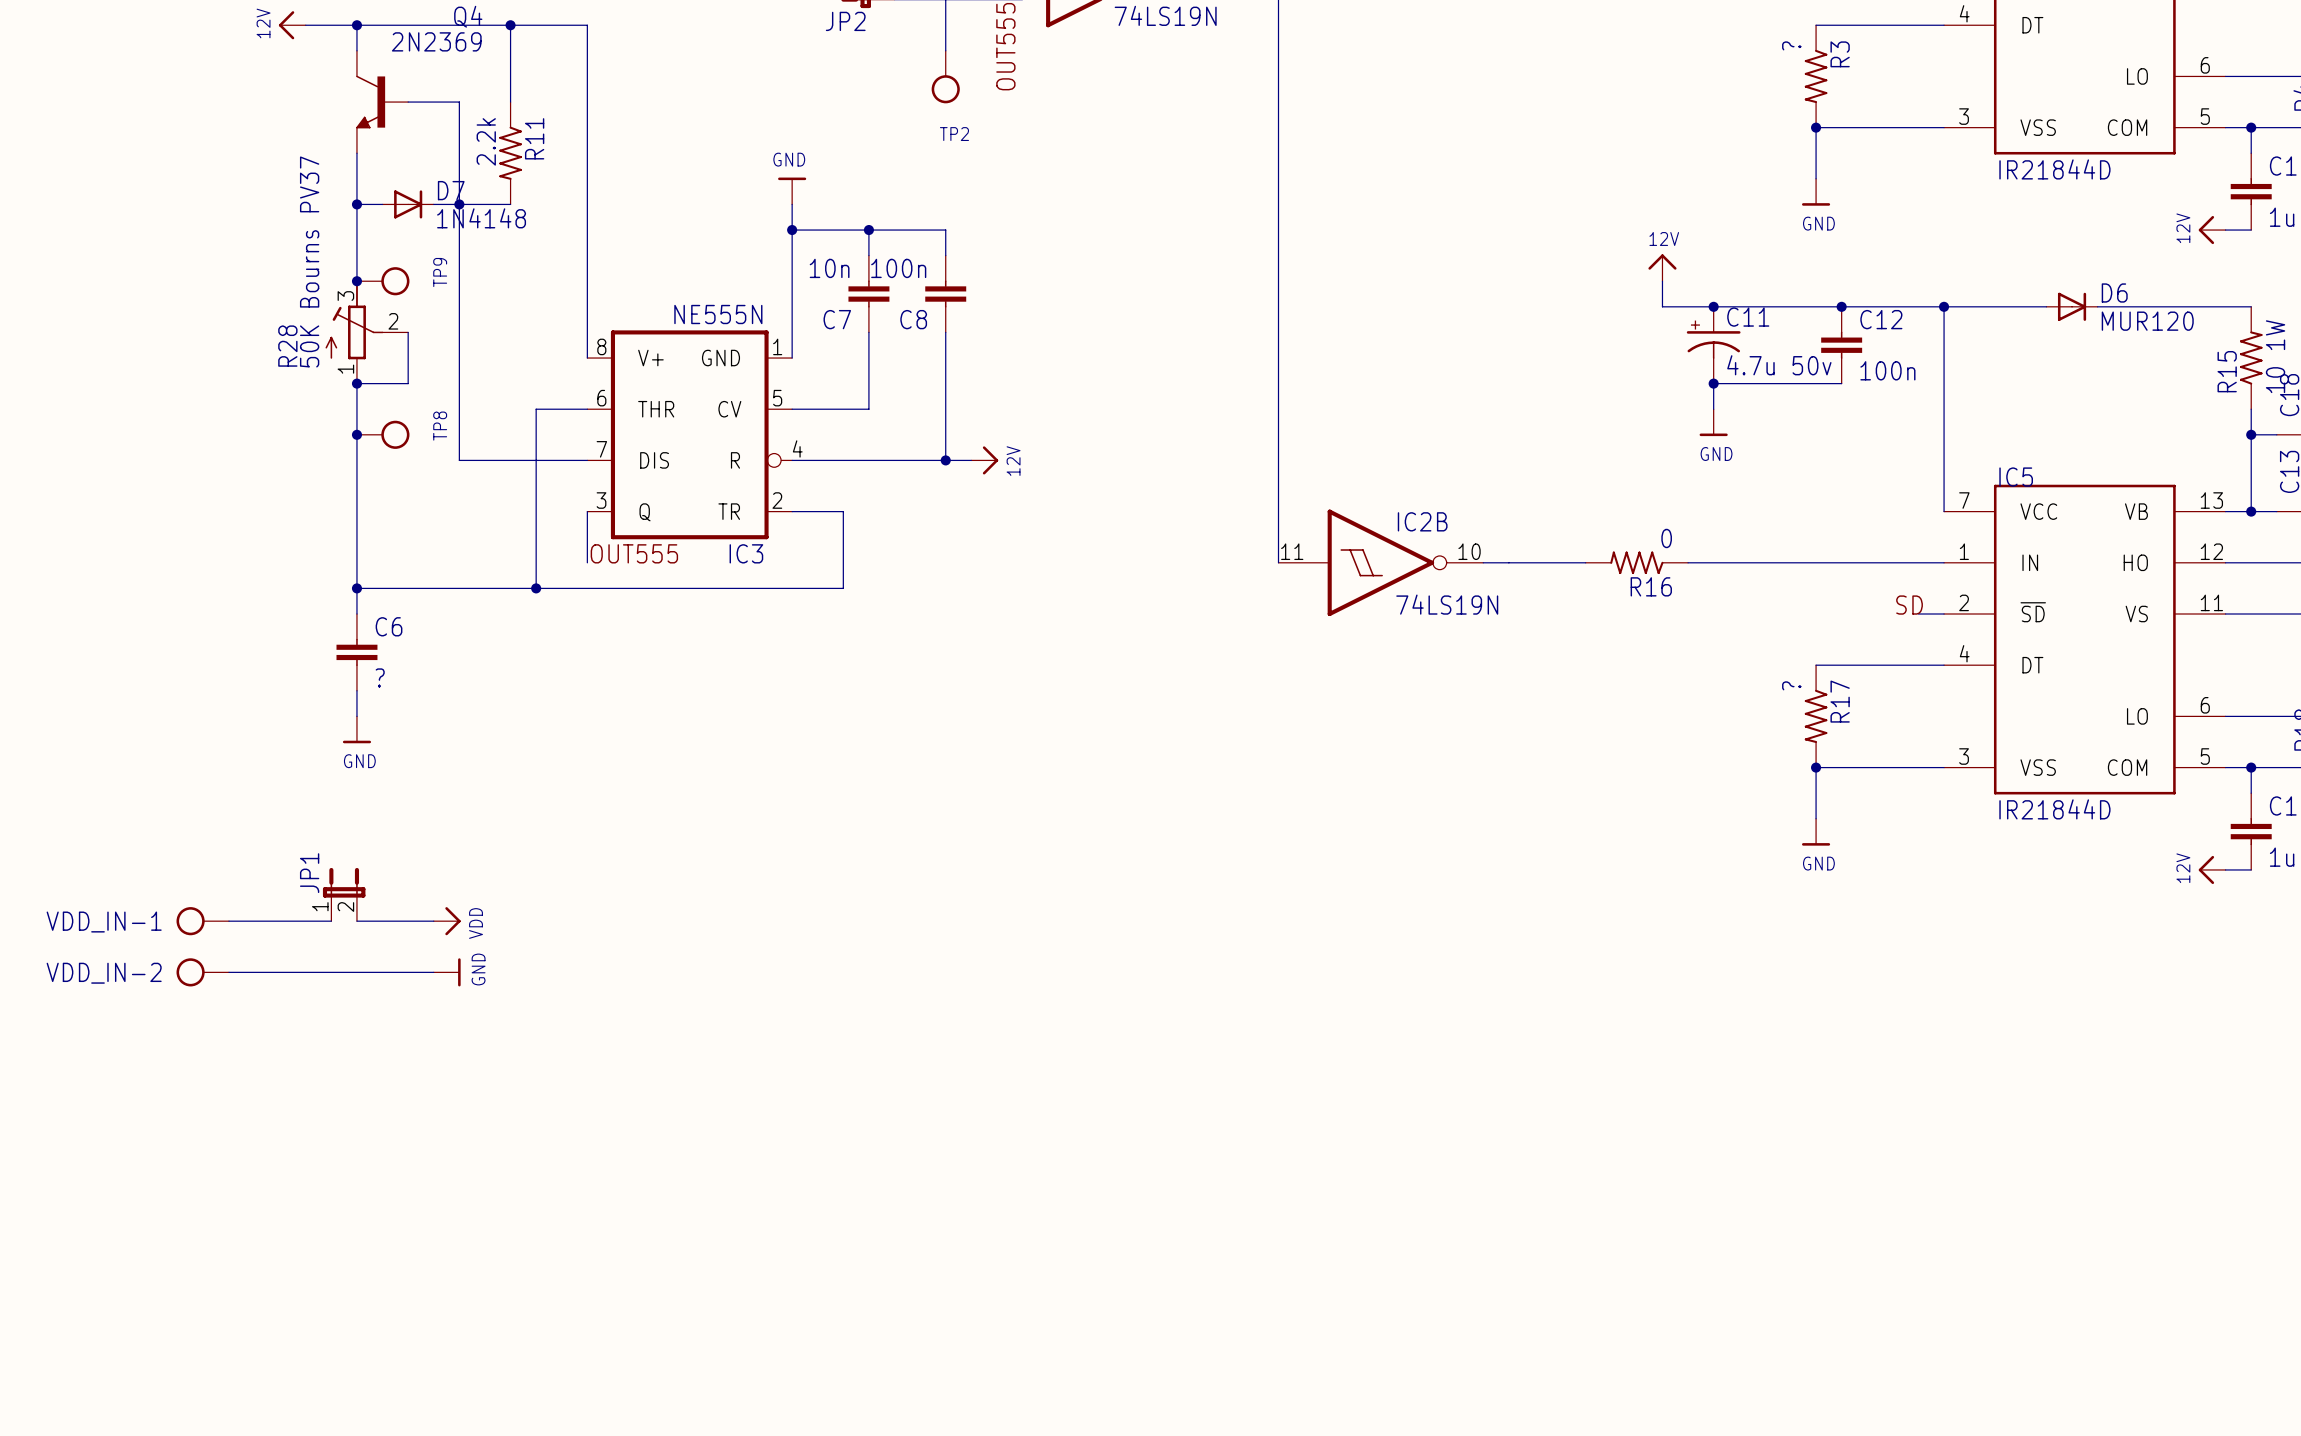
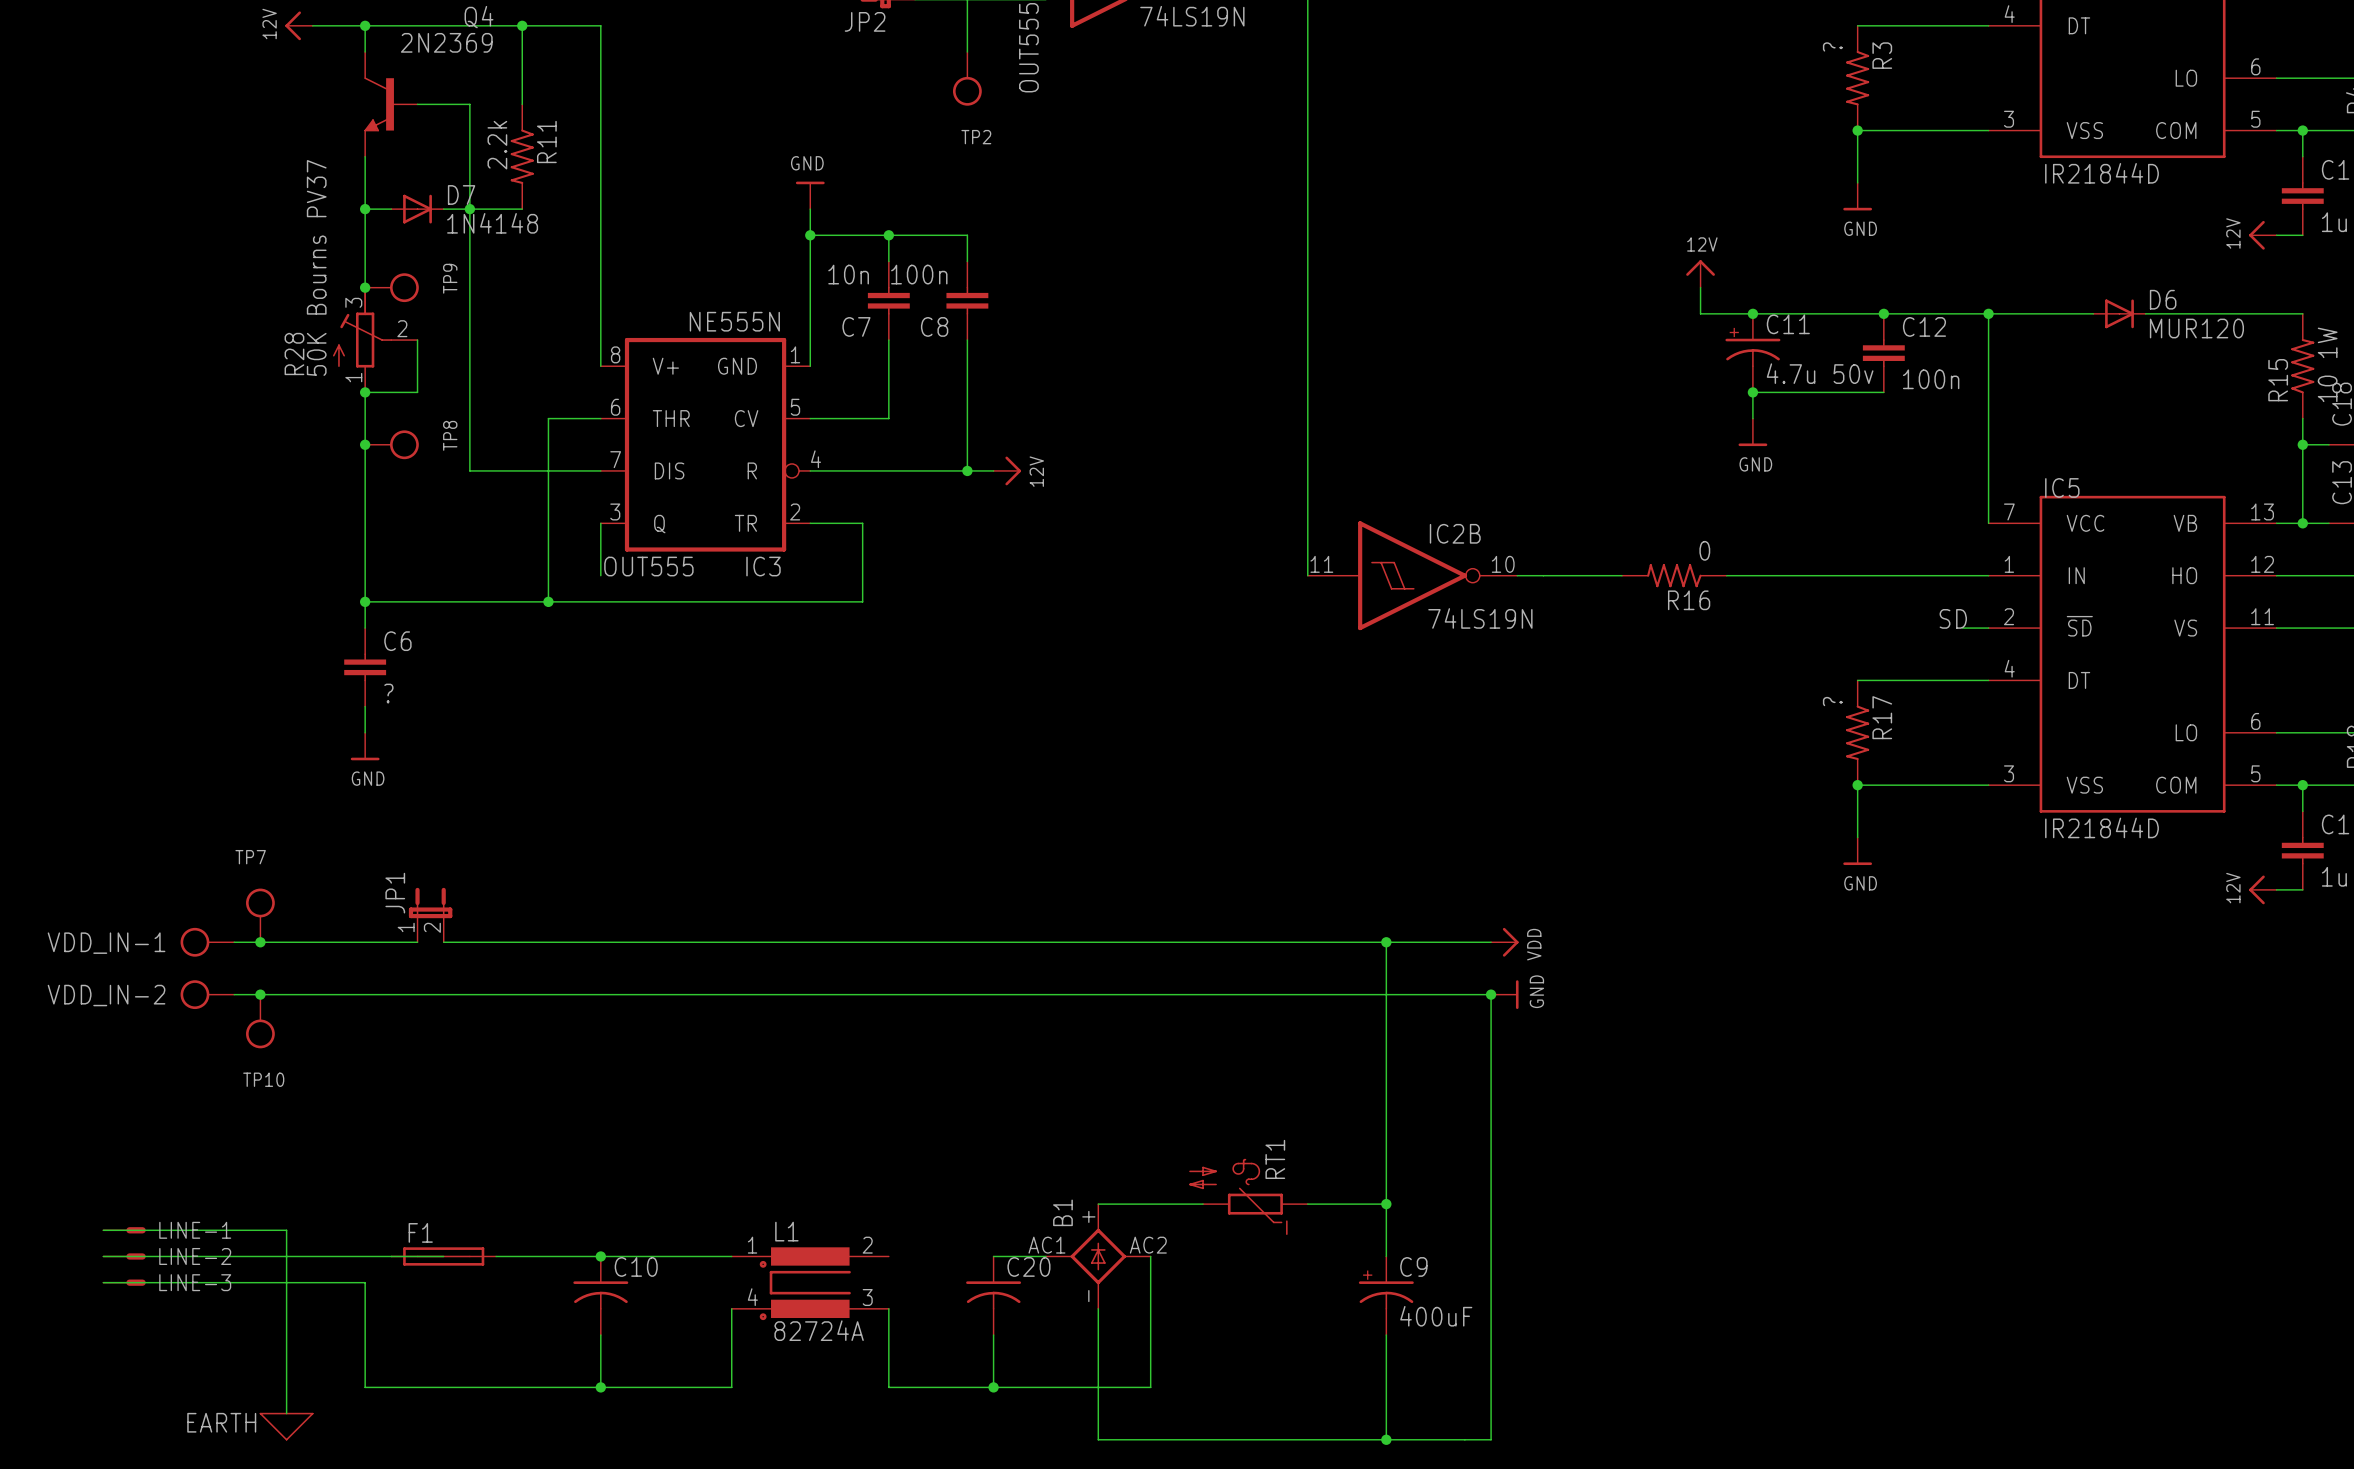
TP7: none -> (260, 915)
JP1 position: (344, 894) -> (430, 915)
junction: none -> (260, 942)
wire: none -> (338, 942) (365, 942)
wire: (408, 921) (433, 921) -> (1491, 942) (443, 942)
power symbol: VDD (447, 921) -> none
wire: none -> (1386, 942) (1386, 1256)
junction: none -> (1386, 942)
power symbol: none -> VDD (1504, 942)
junction: none -> (260, 994)
wire: none -> (443, 994) (1491, 994) (1491, 1439) (1098, 1439) (1098, 1308)
power symbol: GND (447, 972) -> none
junction: none -> (1491, 994)
power symbol: none -> GND (1504, 994)
TP10: none -> (260, 1021)
RT1: none -> (1248, 1196)
wire: none -> (1098, 1204) (1203, 1204)
wire: none -> (1307, 1204) (1386, 1204)
junction: none -> (1386, 1204)
wire: none -> (103, 1230) (286, 1230) (286, 1413)
LINE-1: none -> (124, 1230)
wire: none -> (103, 1256) (443, 1256)
LINE-2: none -> (124, 1256)
F1: none -> (443, 1256)
wire: none -> (496, 1256) (731, 1256)
junction: none -> (600, 1256)
wire: none -> (993, 1256) (1045, 1256)
B1: none -> (1098, 1256)
wire: none -> (1150, 1256) (1150, 1387) (888, 1387) (888, 1308)
wire: none -> (103, 1282) (365, 1282) (365, 1387) (731, 1387) (731, 1308)
LINE-3: none -> (124, 1282)
L1: none -> 82724A (810, 1283)
C10: none -> (600, 1295)
C20: none -> (993, 1295)
C9: none -> 400uF (1386, 1295)
wire: none -> (600, 1335) (600, 1387)
wire: none -> (993, 1335) (993, 1387)
wire: none -> (1386, 1335) (1386, 1439)
junction: none -> (600, 1387)
junction: none -> (993, 1387)
label: none -> EARTH (221, 1422)
power symbol: none -> (286, 1426)
junction: none -> (1386, 1439)

